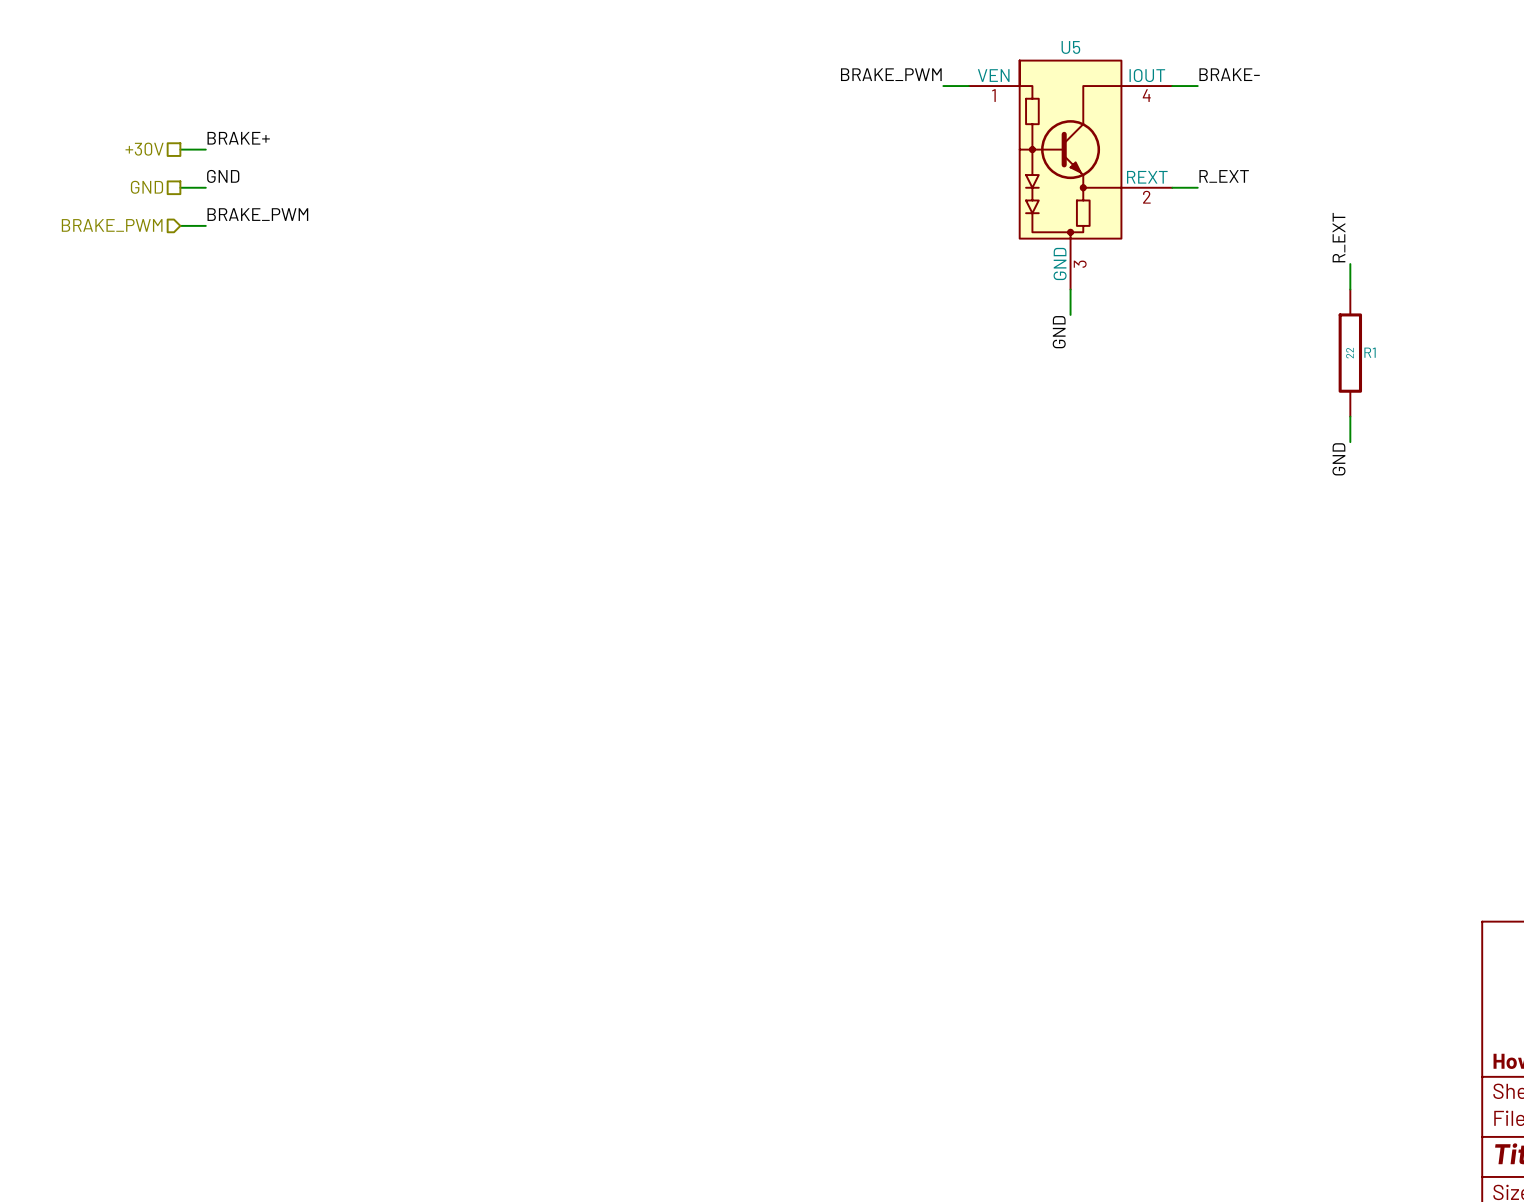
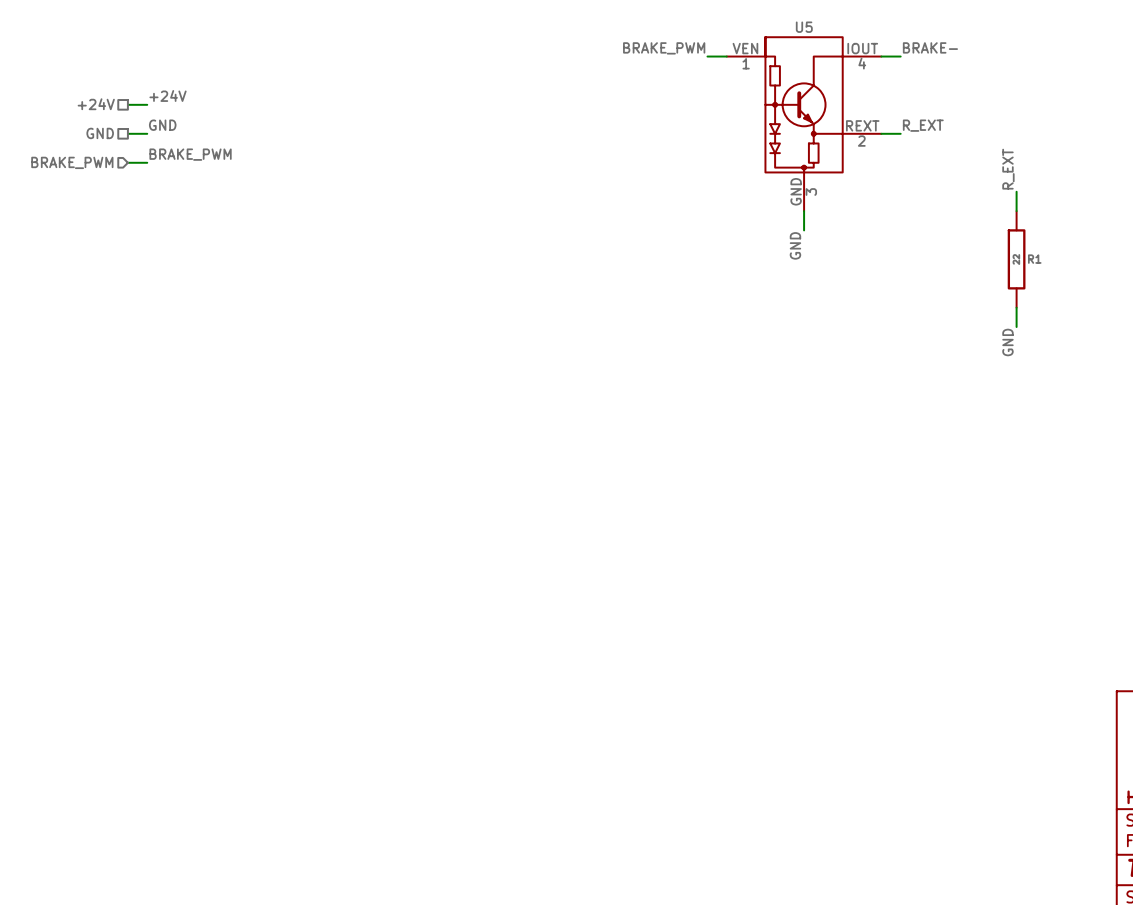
label: BRAKE+ (238, 138) -> +24V (168, 95)
hierarchical label: +30V (144, 149) -> +24V (96, 104)

